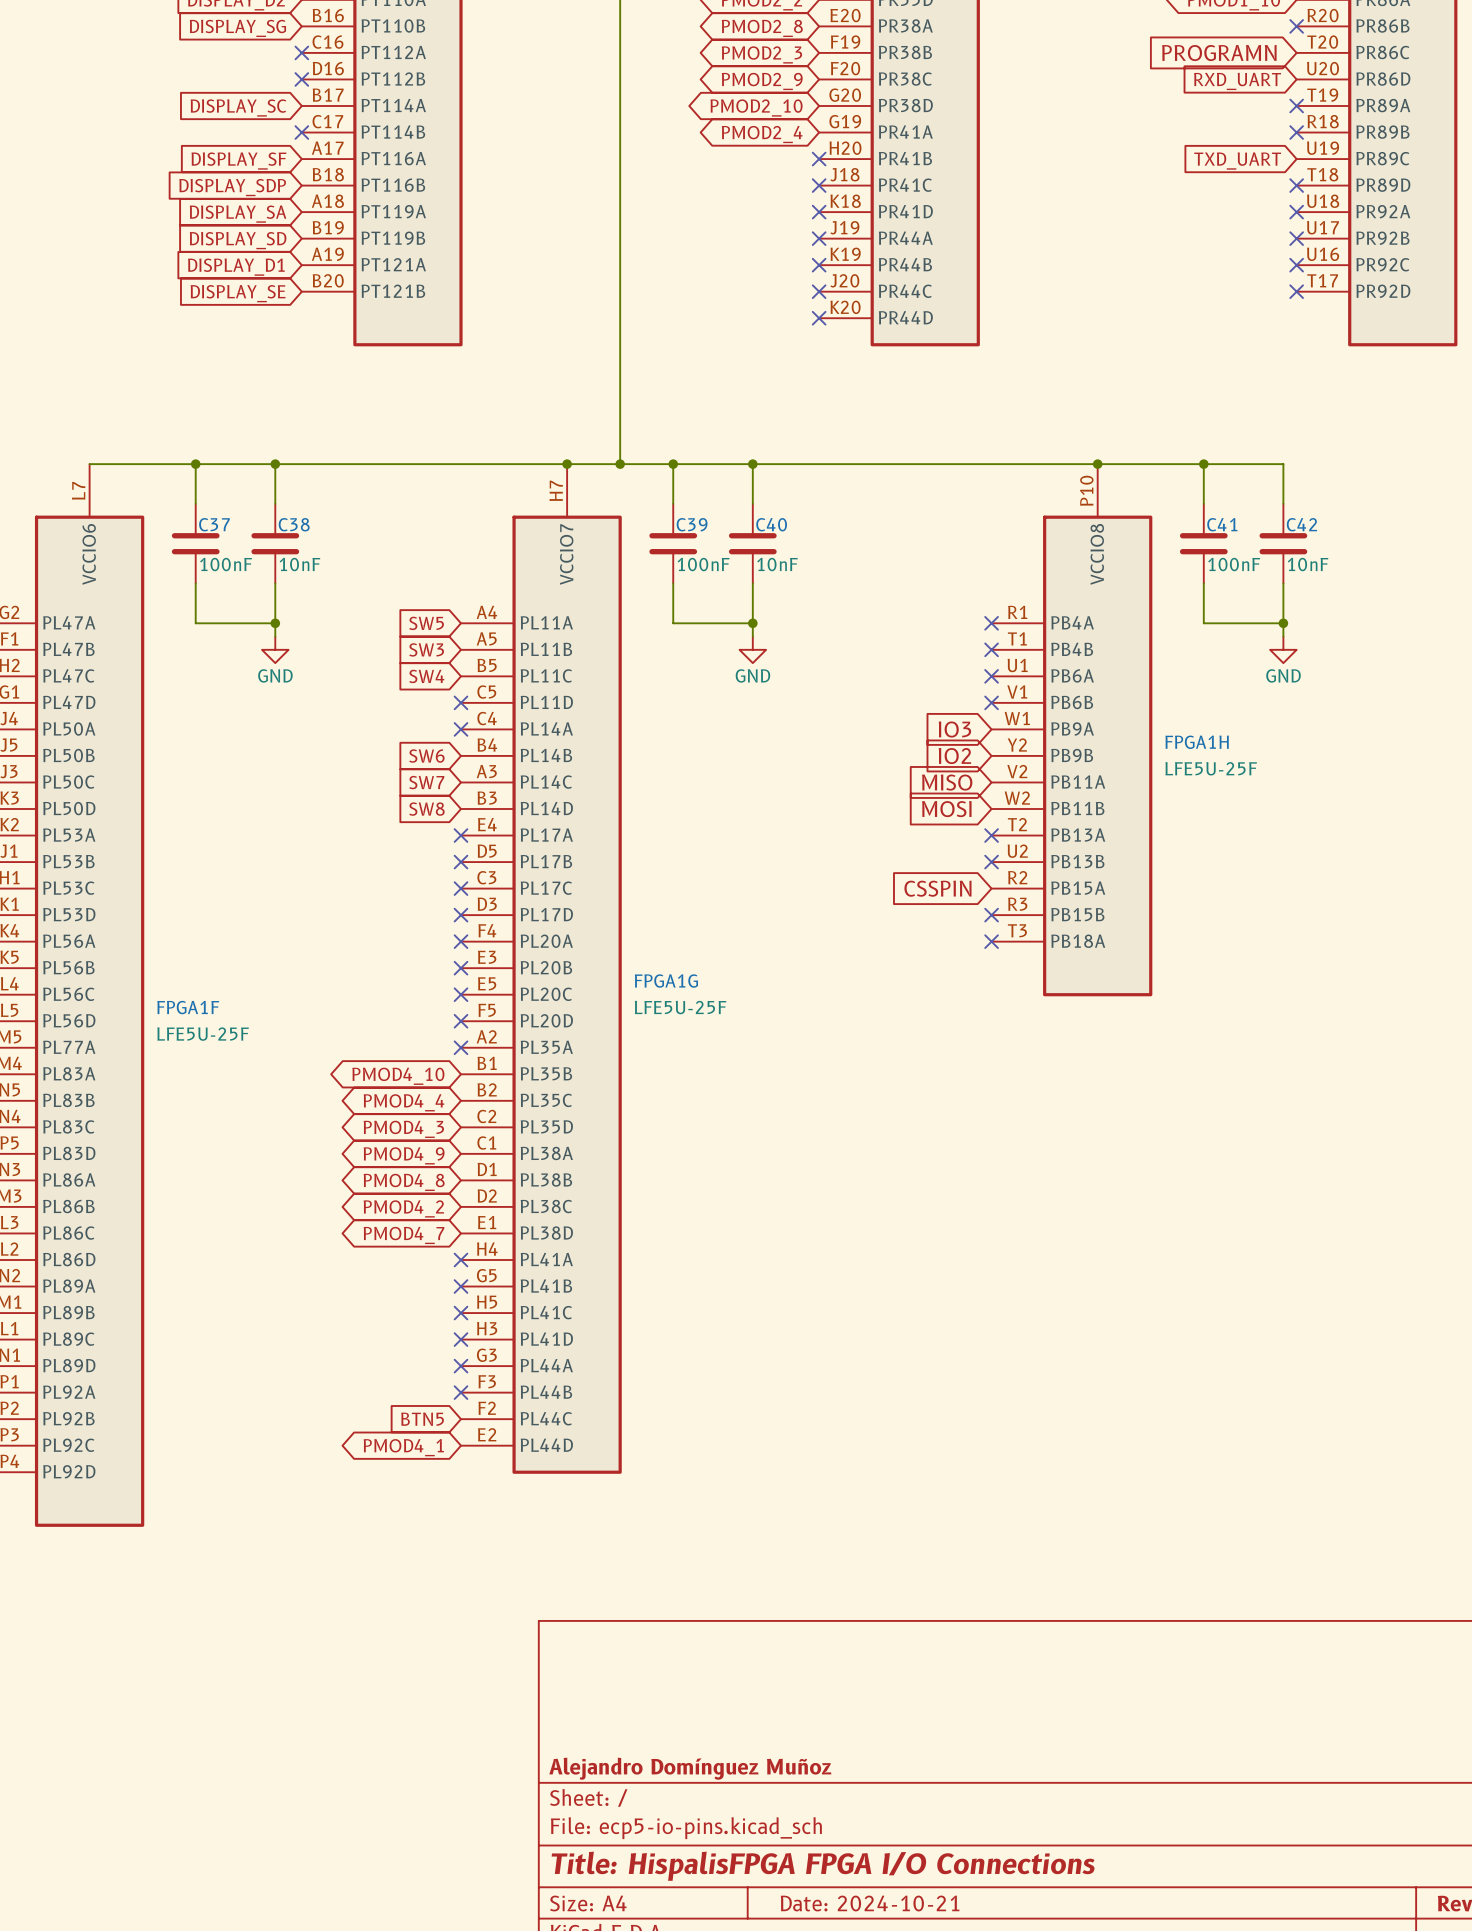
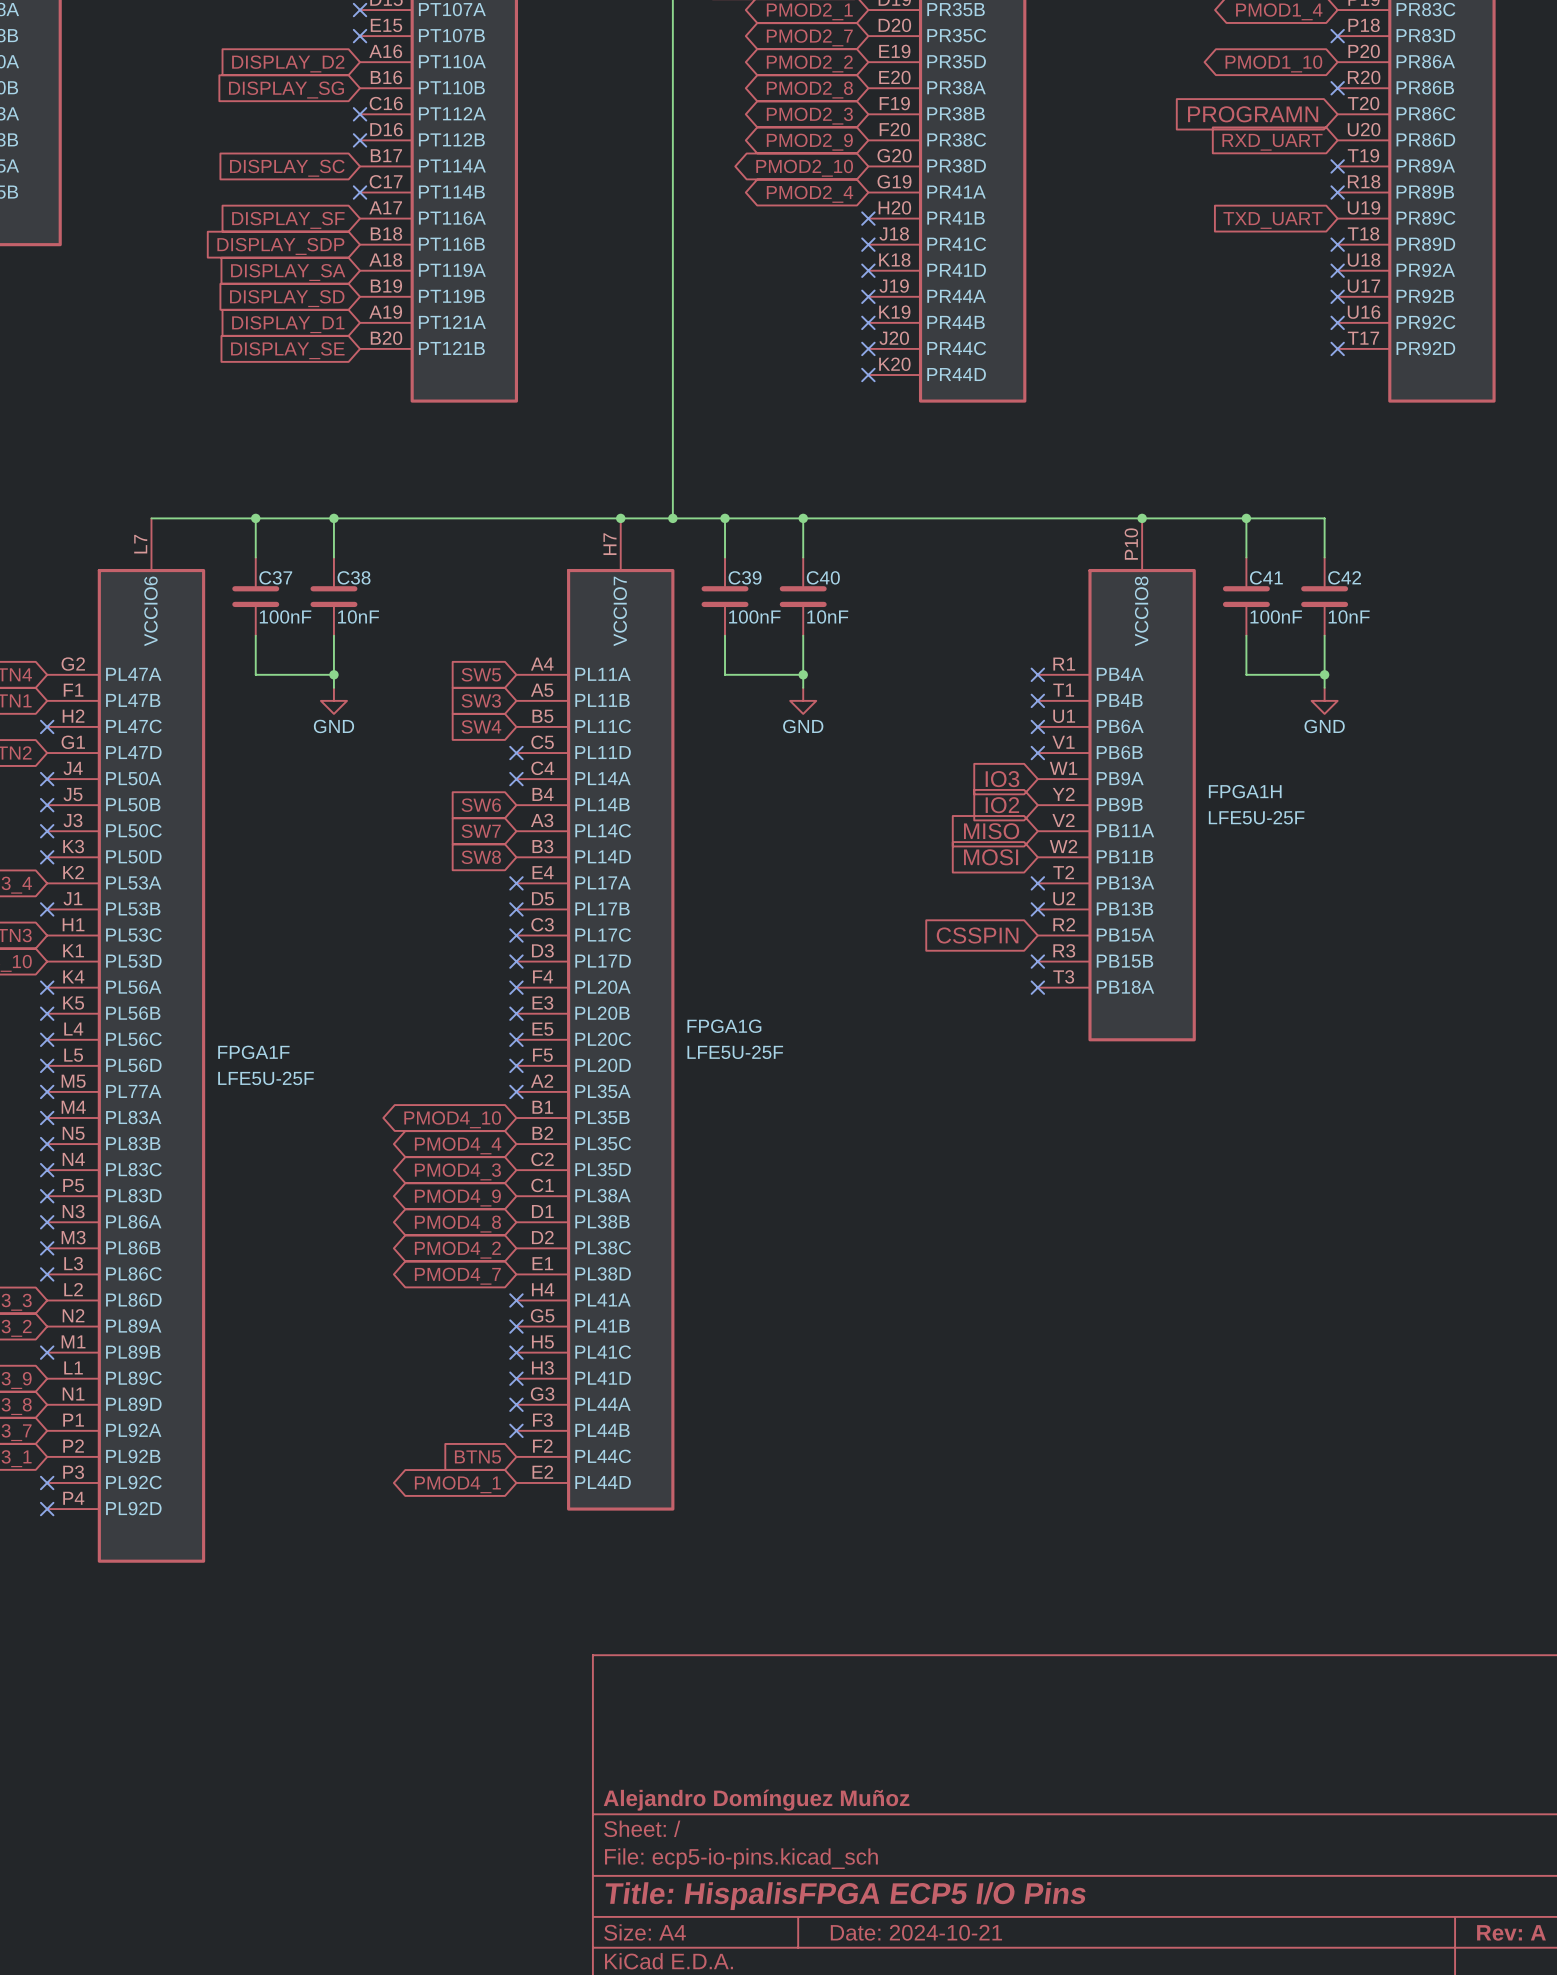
title block: Title: HispalisFPGA FPGA I/O Connections (823, 1866) -> Title: HispalisFPGA ECP5 I/O Pins (845, 1896)

